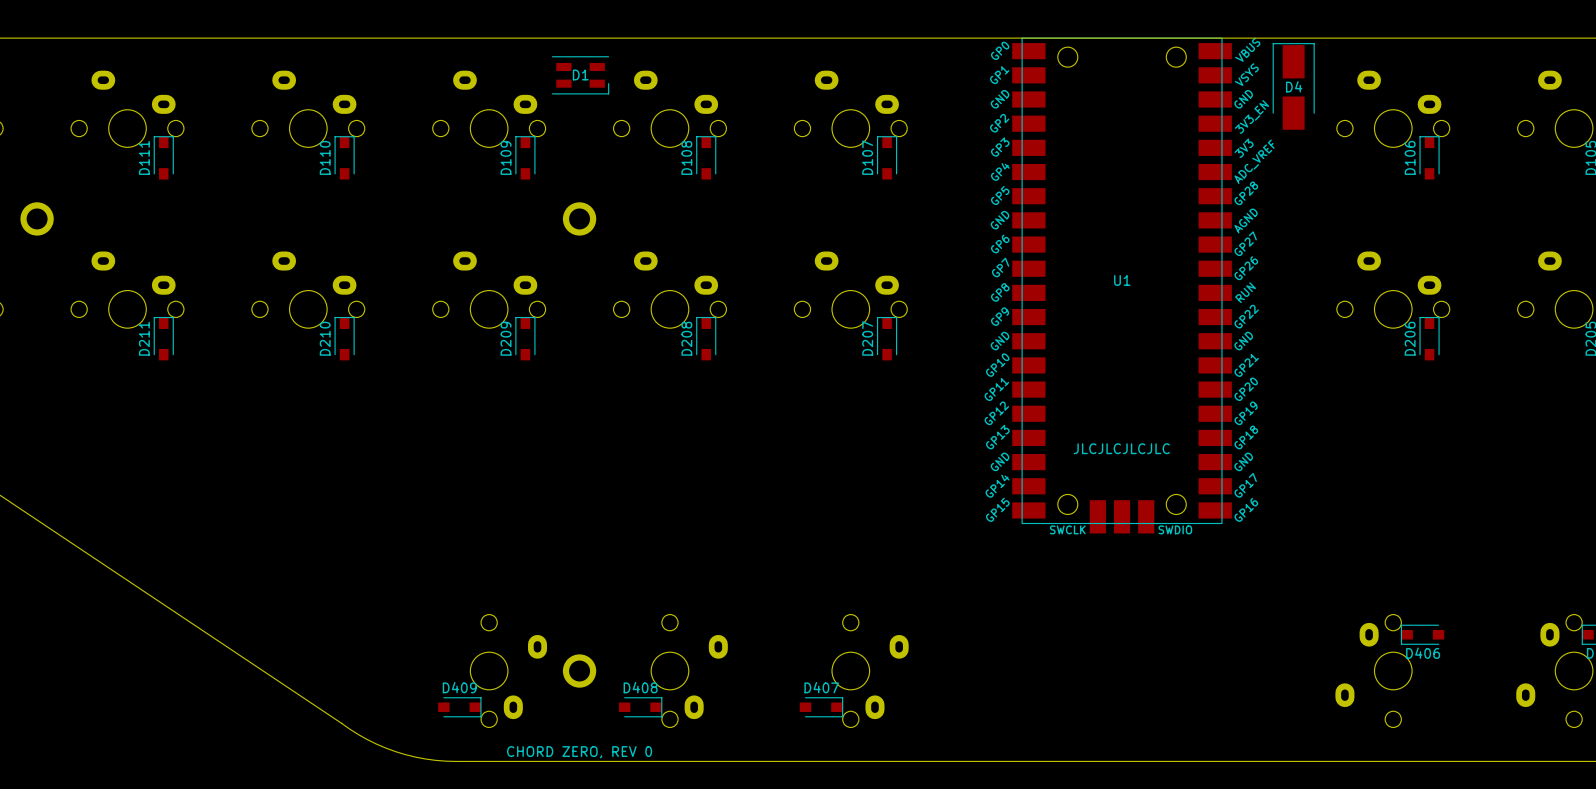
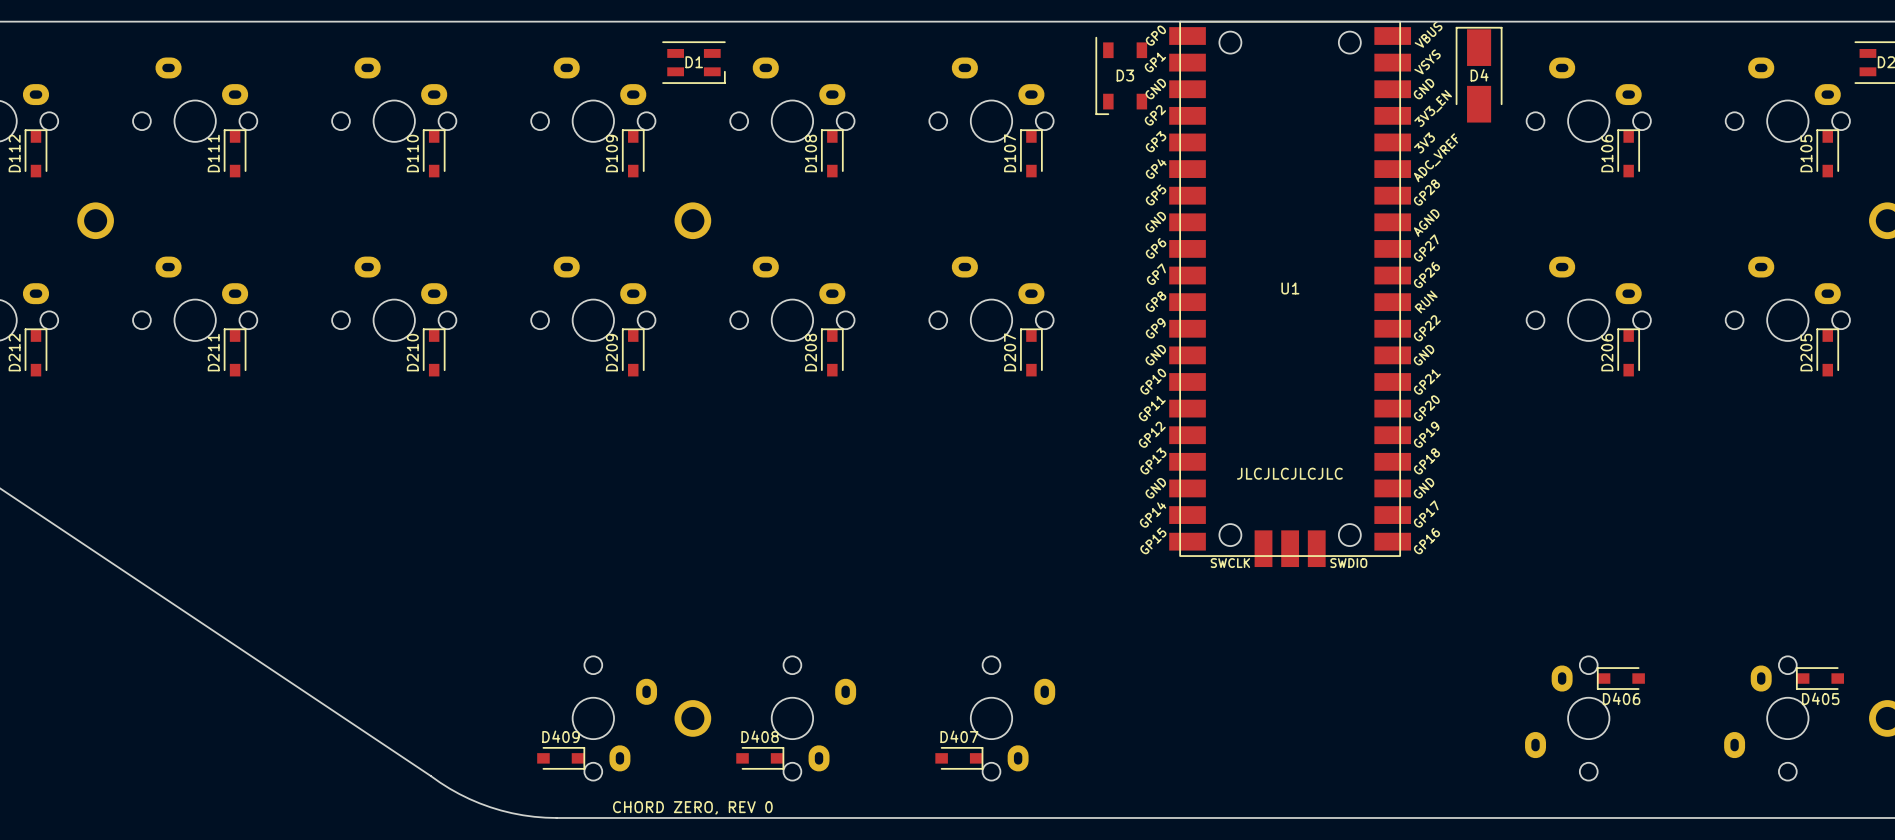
D3: none -> (1121, 75)

